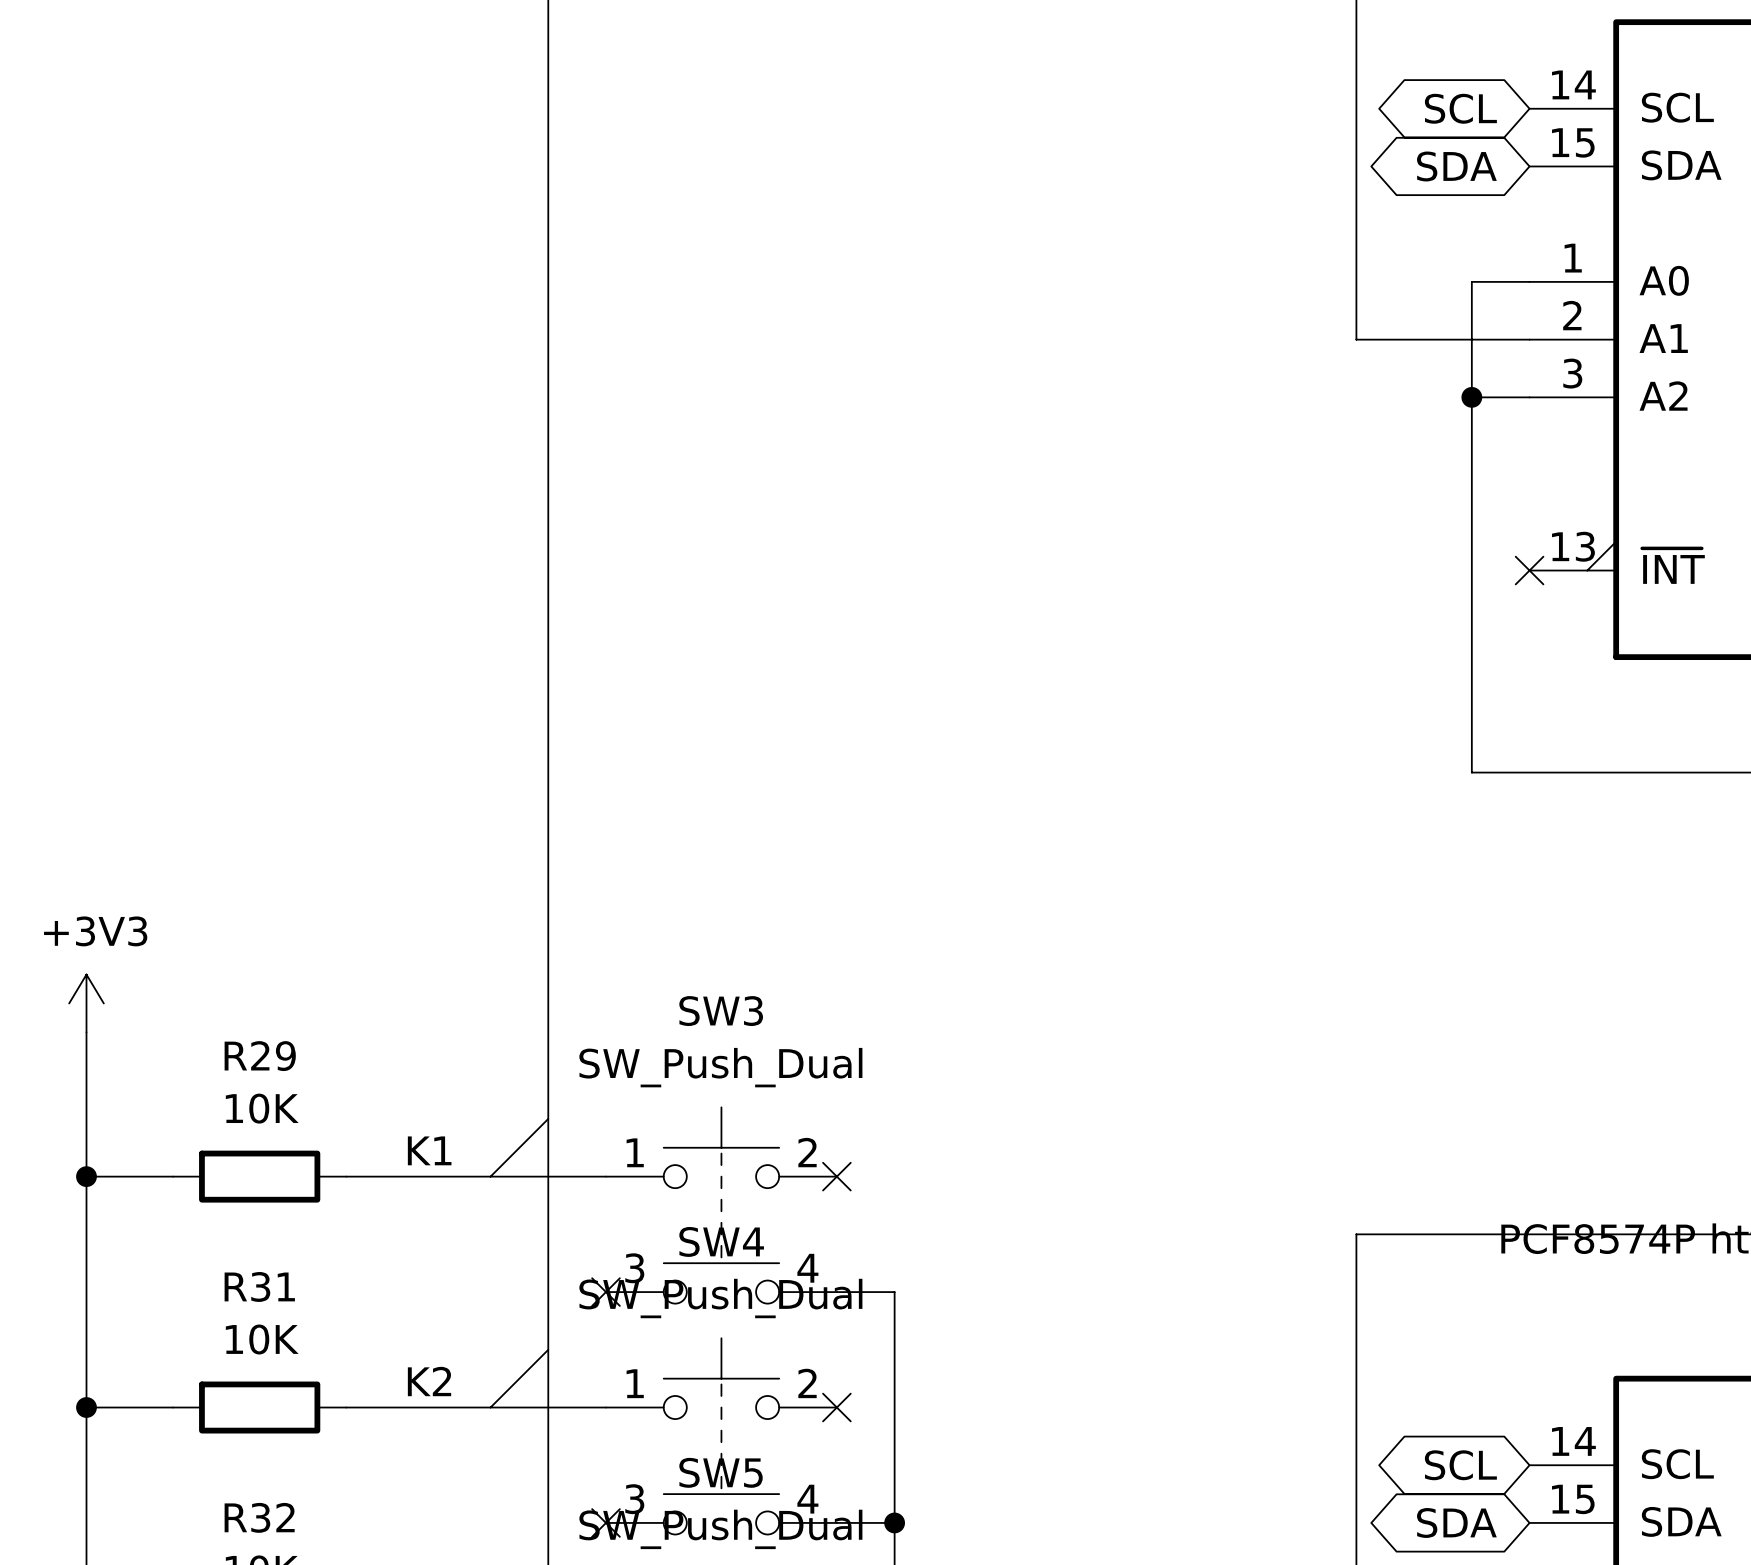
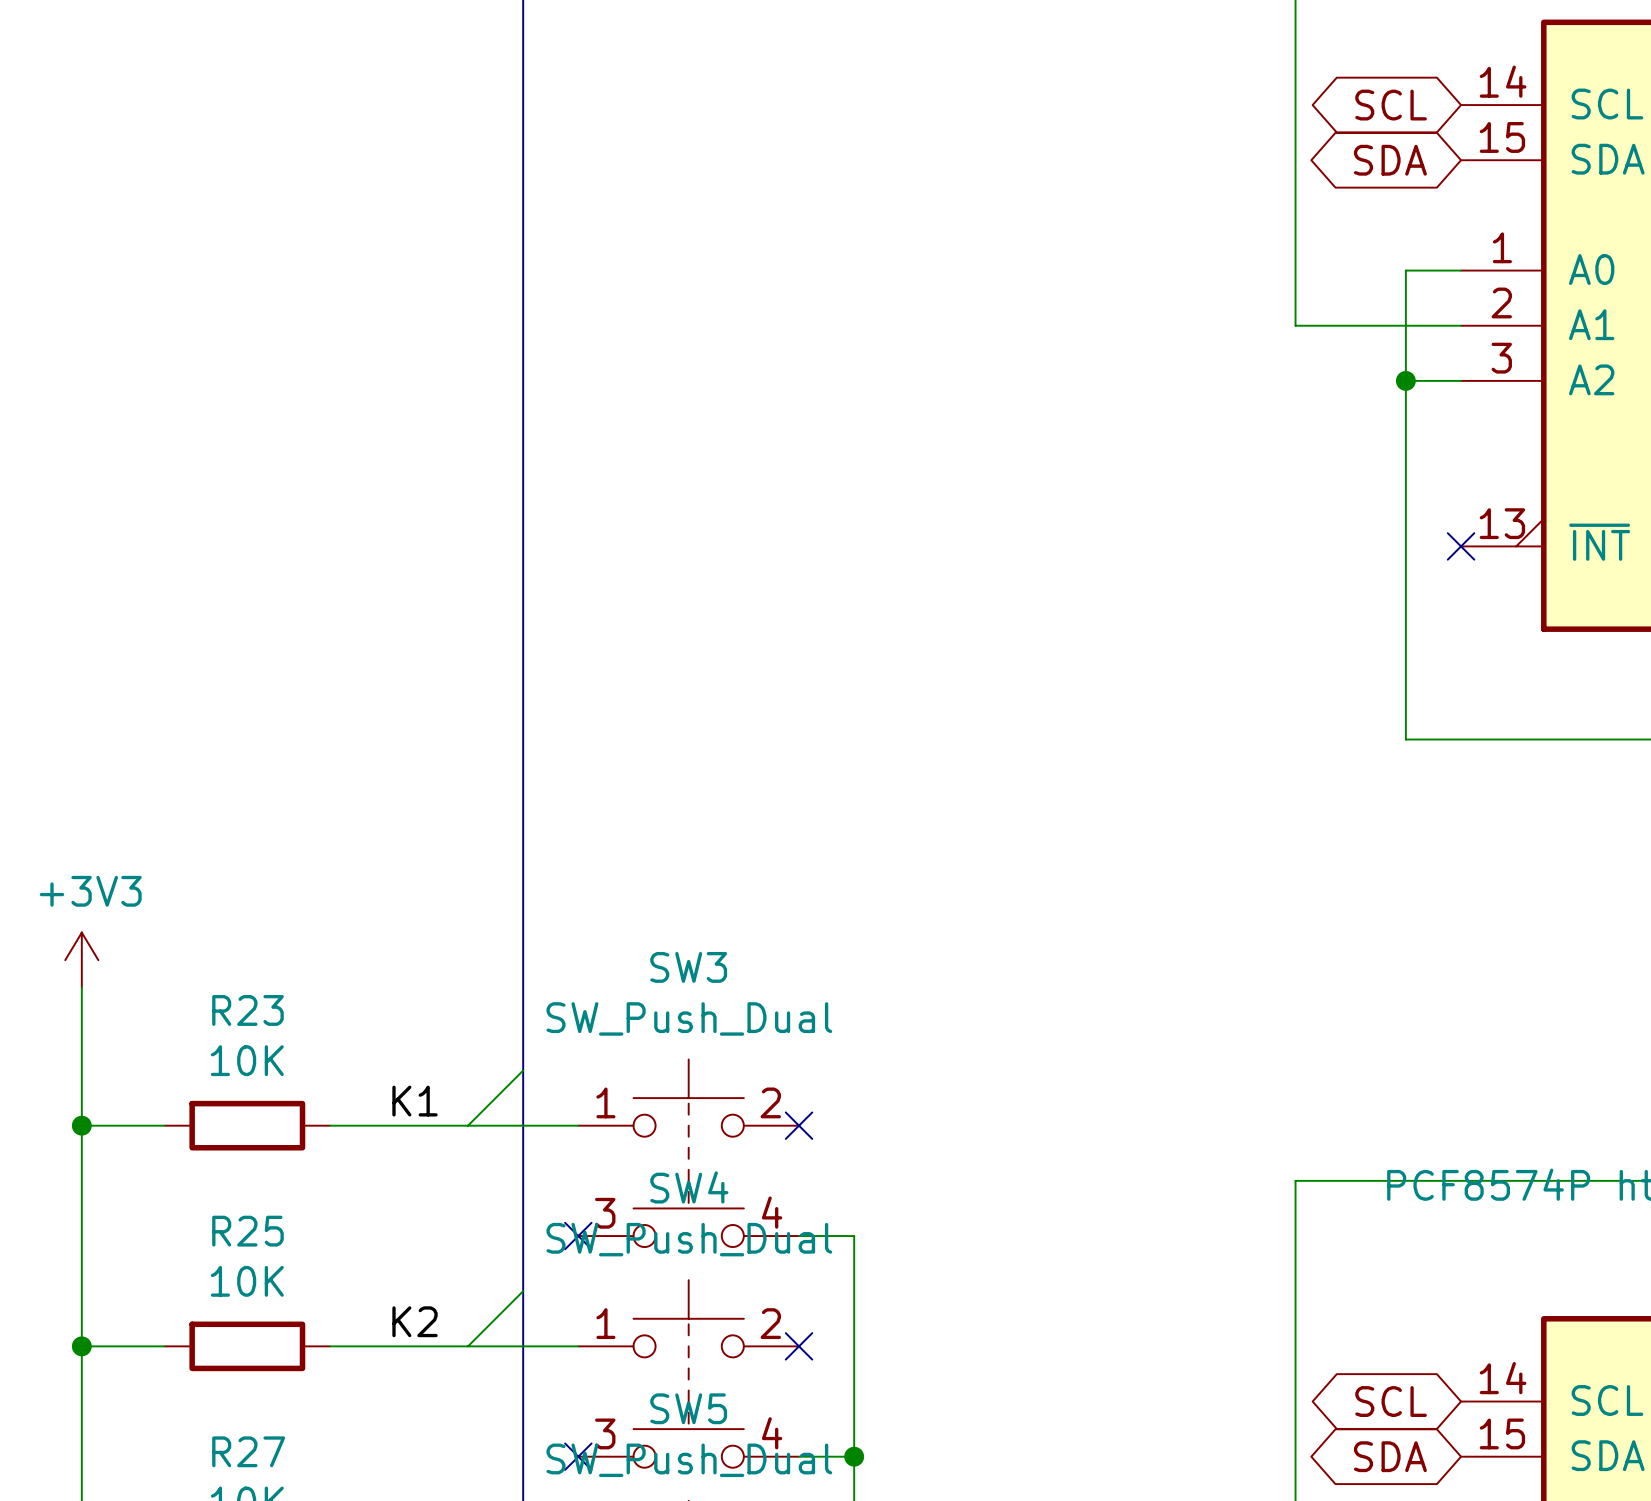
R29 name: R29 (260, 1056) -> R23 (247, 1010)
R31 name: R31 (259, 1286) -> R25 (247, 1231)
R32 name: R32 (259, 1517) -> R27 (248, 1451)

